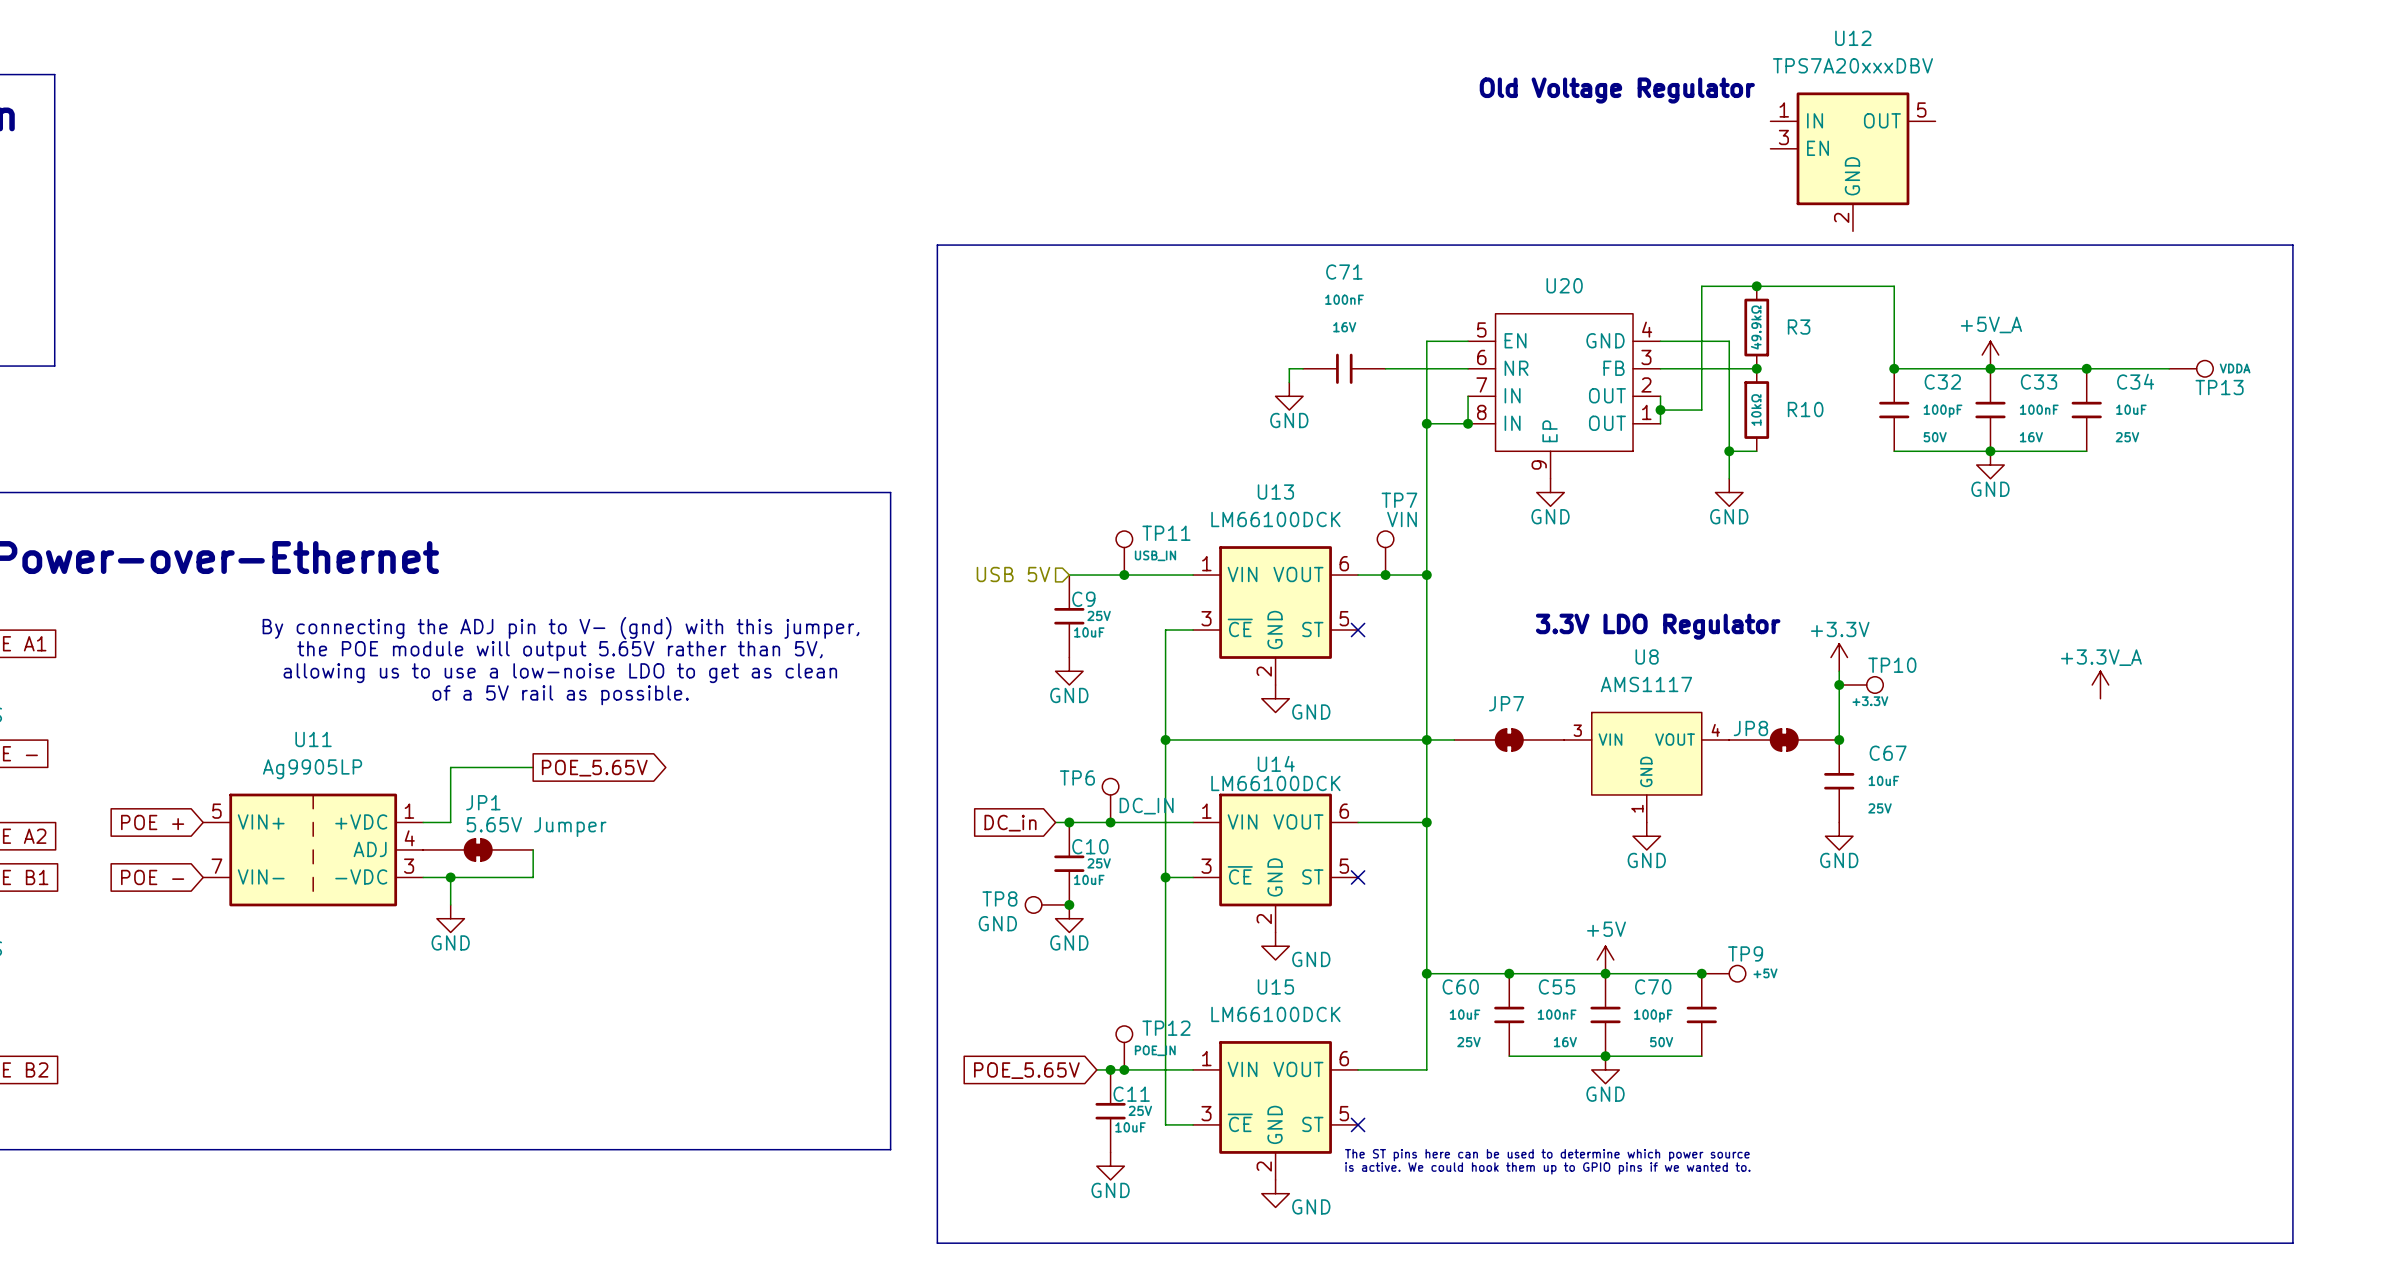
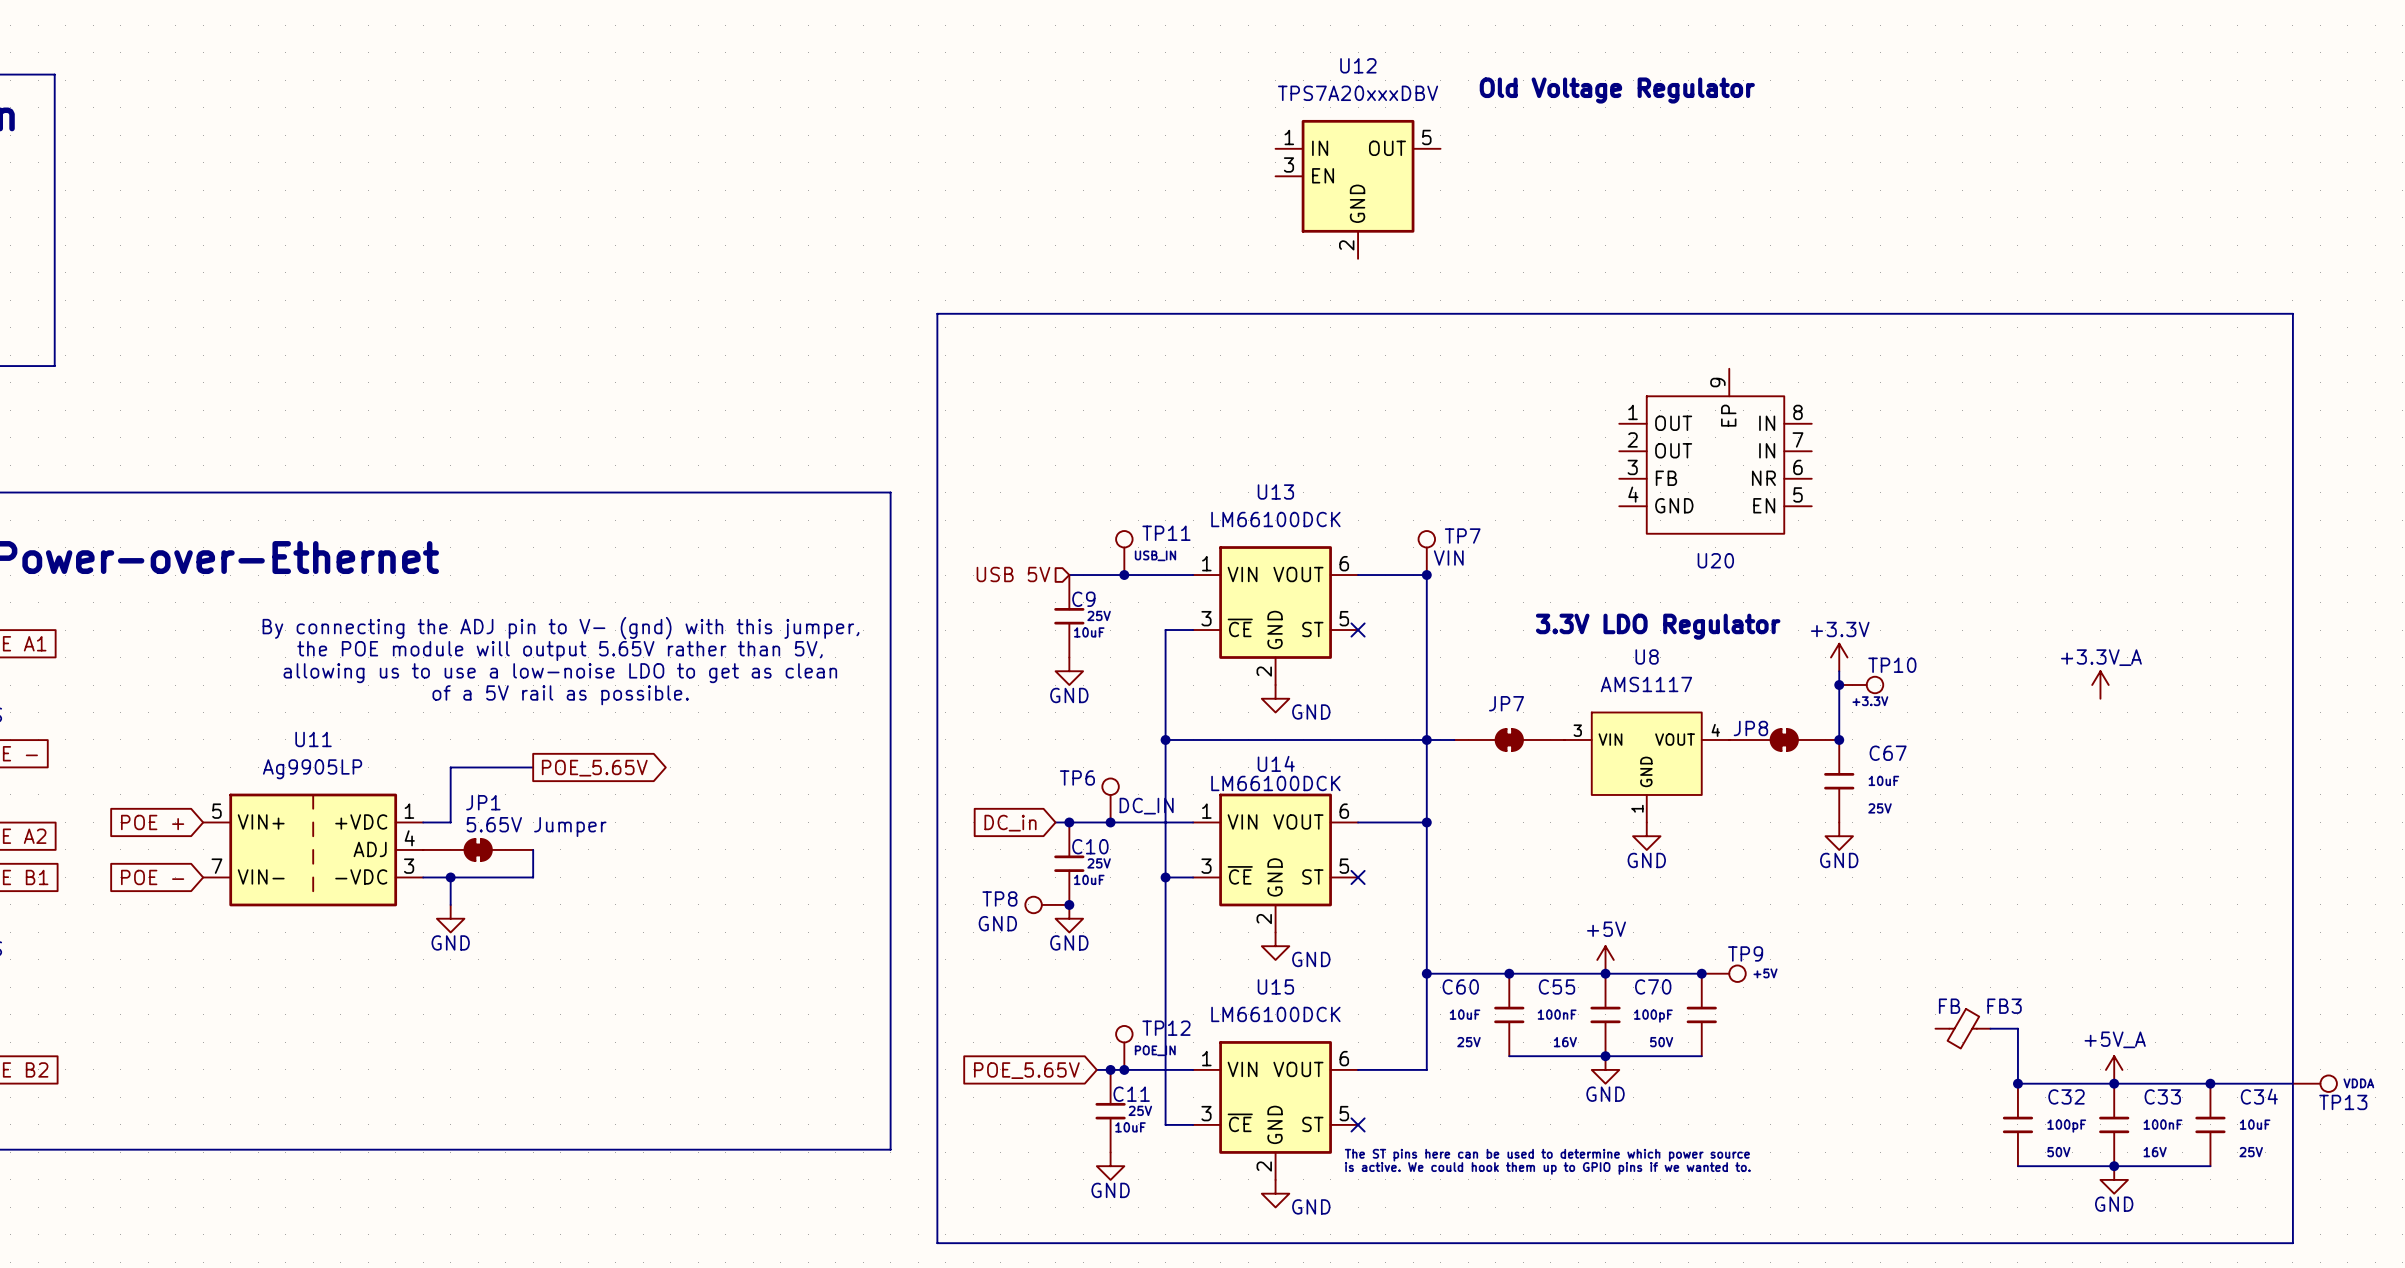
U12 position: (1852, 161) -> (1358, 189)
junction: (1756, 286) -> none
line: (937, 313) (937, 245) (2292, 245) (2292, 313) -> (937, 313) (2292, 313)
R3: 49.9kΩ (1756, 327) -> none
wire: (1468, 341) (1426, 341) (1426, 575) -> none
wire: (1660, 341) (1729, 341) (1729, 478) -> none
power symbol: +5V_A (1990, 355) -> none
wire: (1303, 368) (1289, 368) (1289, 382) -> none
C71: 100nF (1344, 368) -> none
wire: (1385, 368) (1468, 368) -> none
wire: (1660, 368) (1756, 368) -> none
junction: (1756, 368) -> none
junction: (1894, 368) -> none
junction: (1990, 368) -> none
junction: (2086, 368) -> none
wire: (2169, 368) (1894, 368) (1894, 286) (1701, 286) (1701, 410) (1660, 410) -> none
TP13 position: (2191, 368) -> (2314, 1083)
U20 rotation: 0° (1564, 382) -> 180° (1715, 465)
power symbol: GND (1289, 396) -> none
wire: (1468, 396) (1468, 423) (1426, 423) -> none
U20 position: (1564, 396) -> (1715, 451)
wire: (1660, 396) (1660, 423) -> none
junction: (1660, 410) -> none
R10: 10kΩ (1756, 410) -> none
C32 position: (1894, 410) -> (2017, 1124)
C33 position: (1990, 410) -> (2114, 1124)
C34 position: (2086, 410) -> (2210, 1124)
junction: (1426, 423) -> none
junction: (1468, 423) -> none
wire: (1729, 451) (1756, 451) -> none
junction: (1729, 451) -> none
wire: (1894, 451) (2086, 451) -> none
junction: (1990, 451) -> none
power symbol: GND (1990, 465) -> none
power symbol: GND (1550, 492) -> none
power symbol: GND (1729, 492) -> none
TP7 name position: TP7 (1399, 500) -> TP7 (1462, 536)
TP7 value position: VIN (1402, 519) -> VIN (1448, 558)
TP7 position: (1385, 553) -> (1426, 553)
junction: (1385, 575) -> none
FB3: none -> FB (1962, 1028)
wire: none -> (1990, 1028) (2017, 1028) (2017, 1083) (2292, 1083)
power symbol: none -> +5V_A (2114, 1069)
junction: none -> (2017, 1083)
junction: none -> (2114, 1083)
junction: none -> (2210, 1083)
wire: none -> (2017, 1166) (2210, 1166)
junction: none -> (2114, 1166)
power symbol: none -> GND (2114, 1179)

